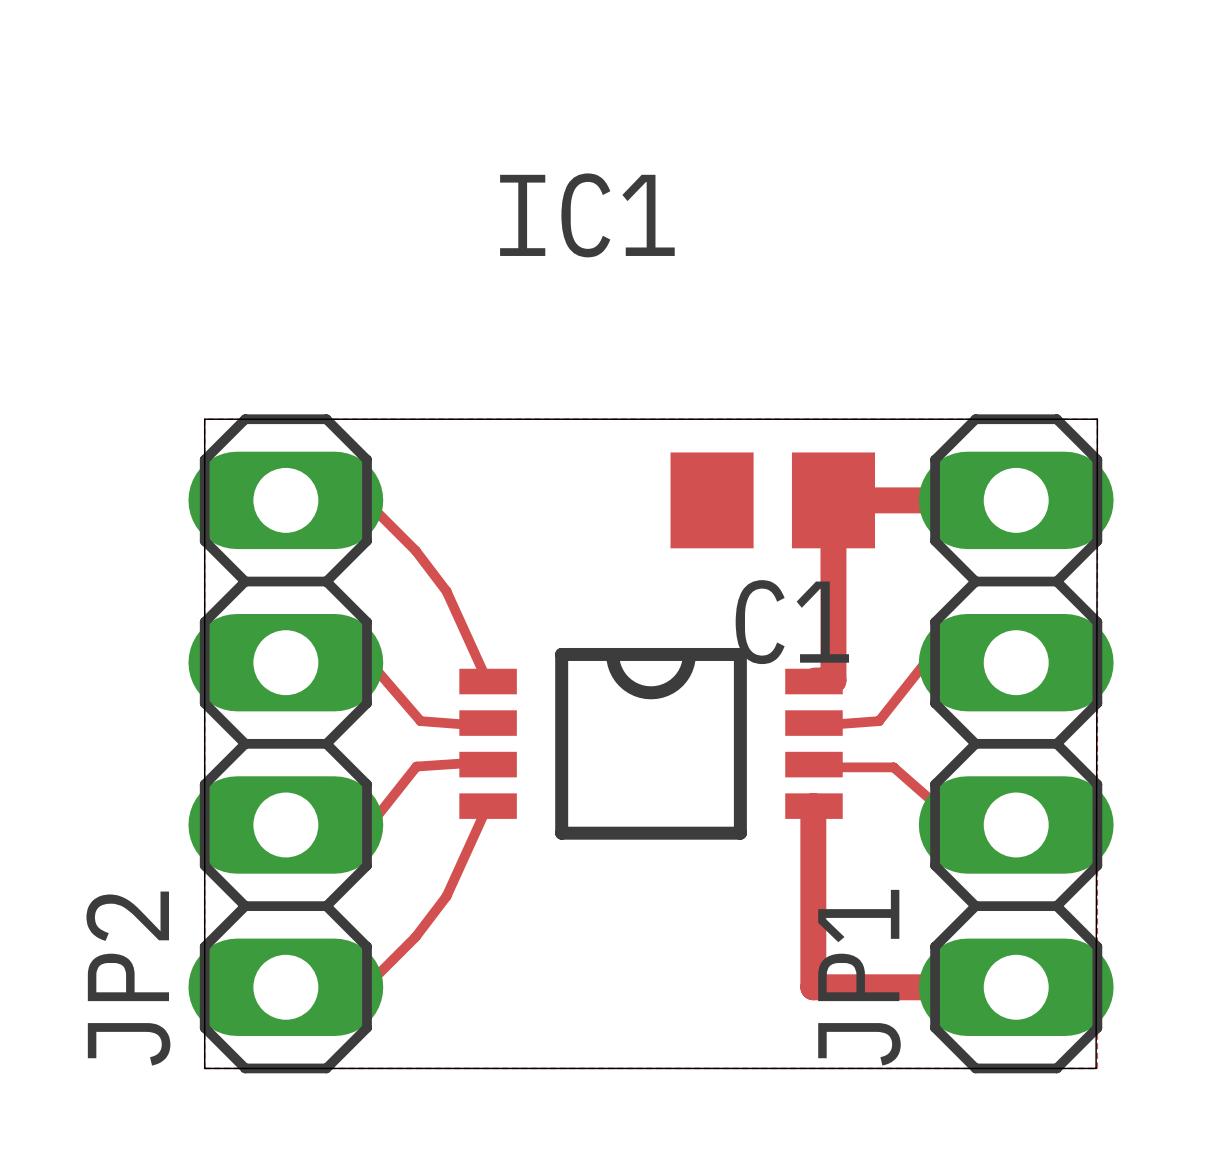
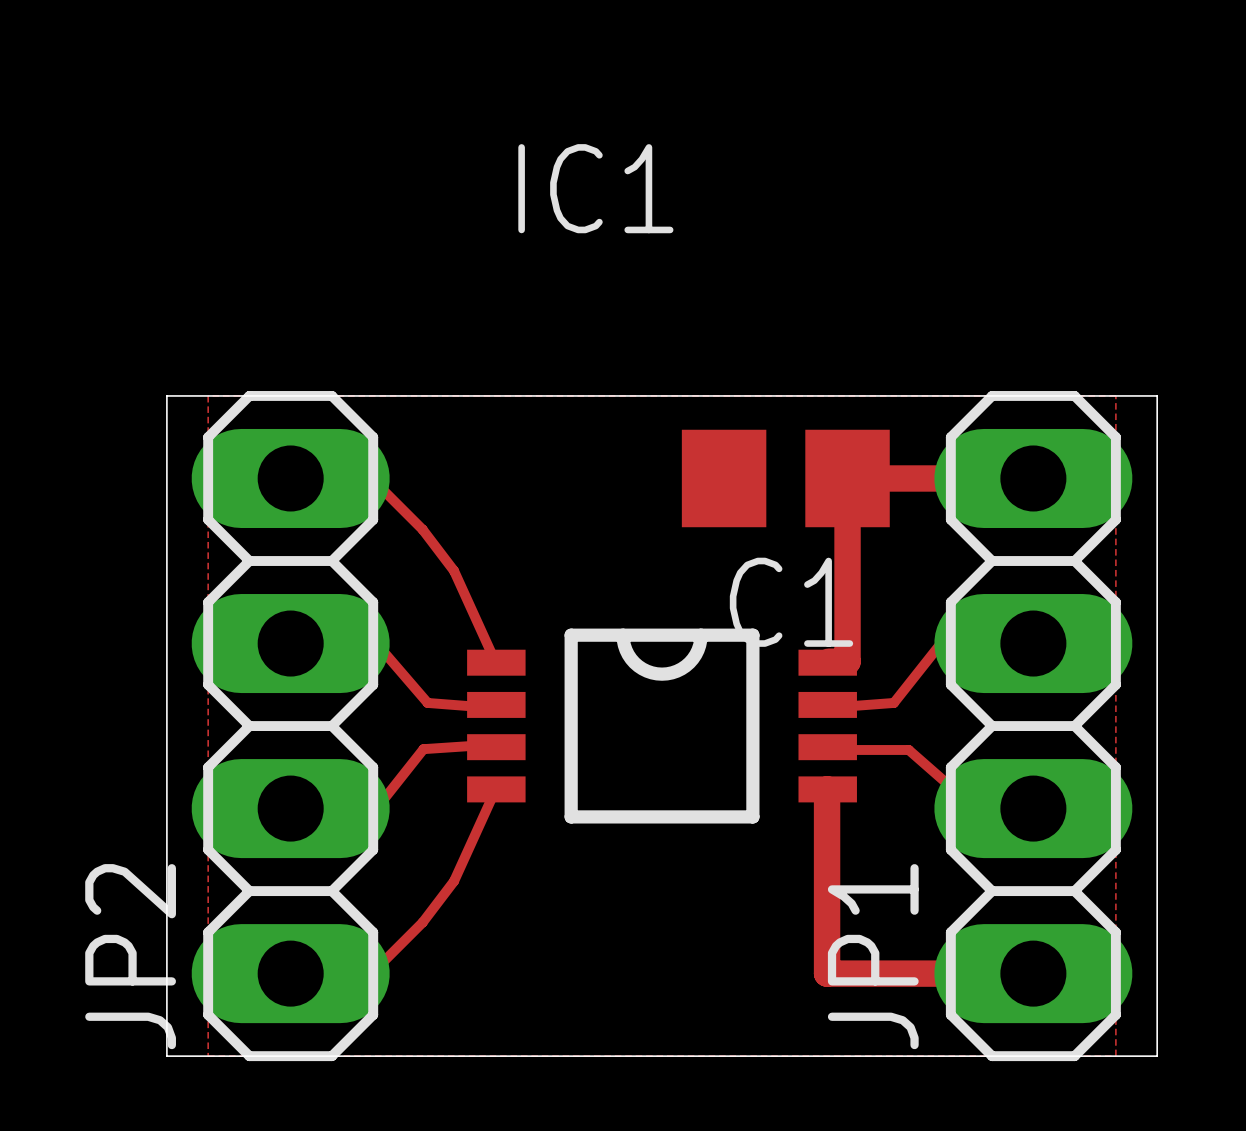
board edge: (204, 419) (204, 1068) -> (208, 395) (166, 395) (166, 1056) (208, 1056)
board edge: (1097, 419) (1096, 1068) -> (1115, 395) (1157, 395) (1157, 1056) (1114, 1056)

